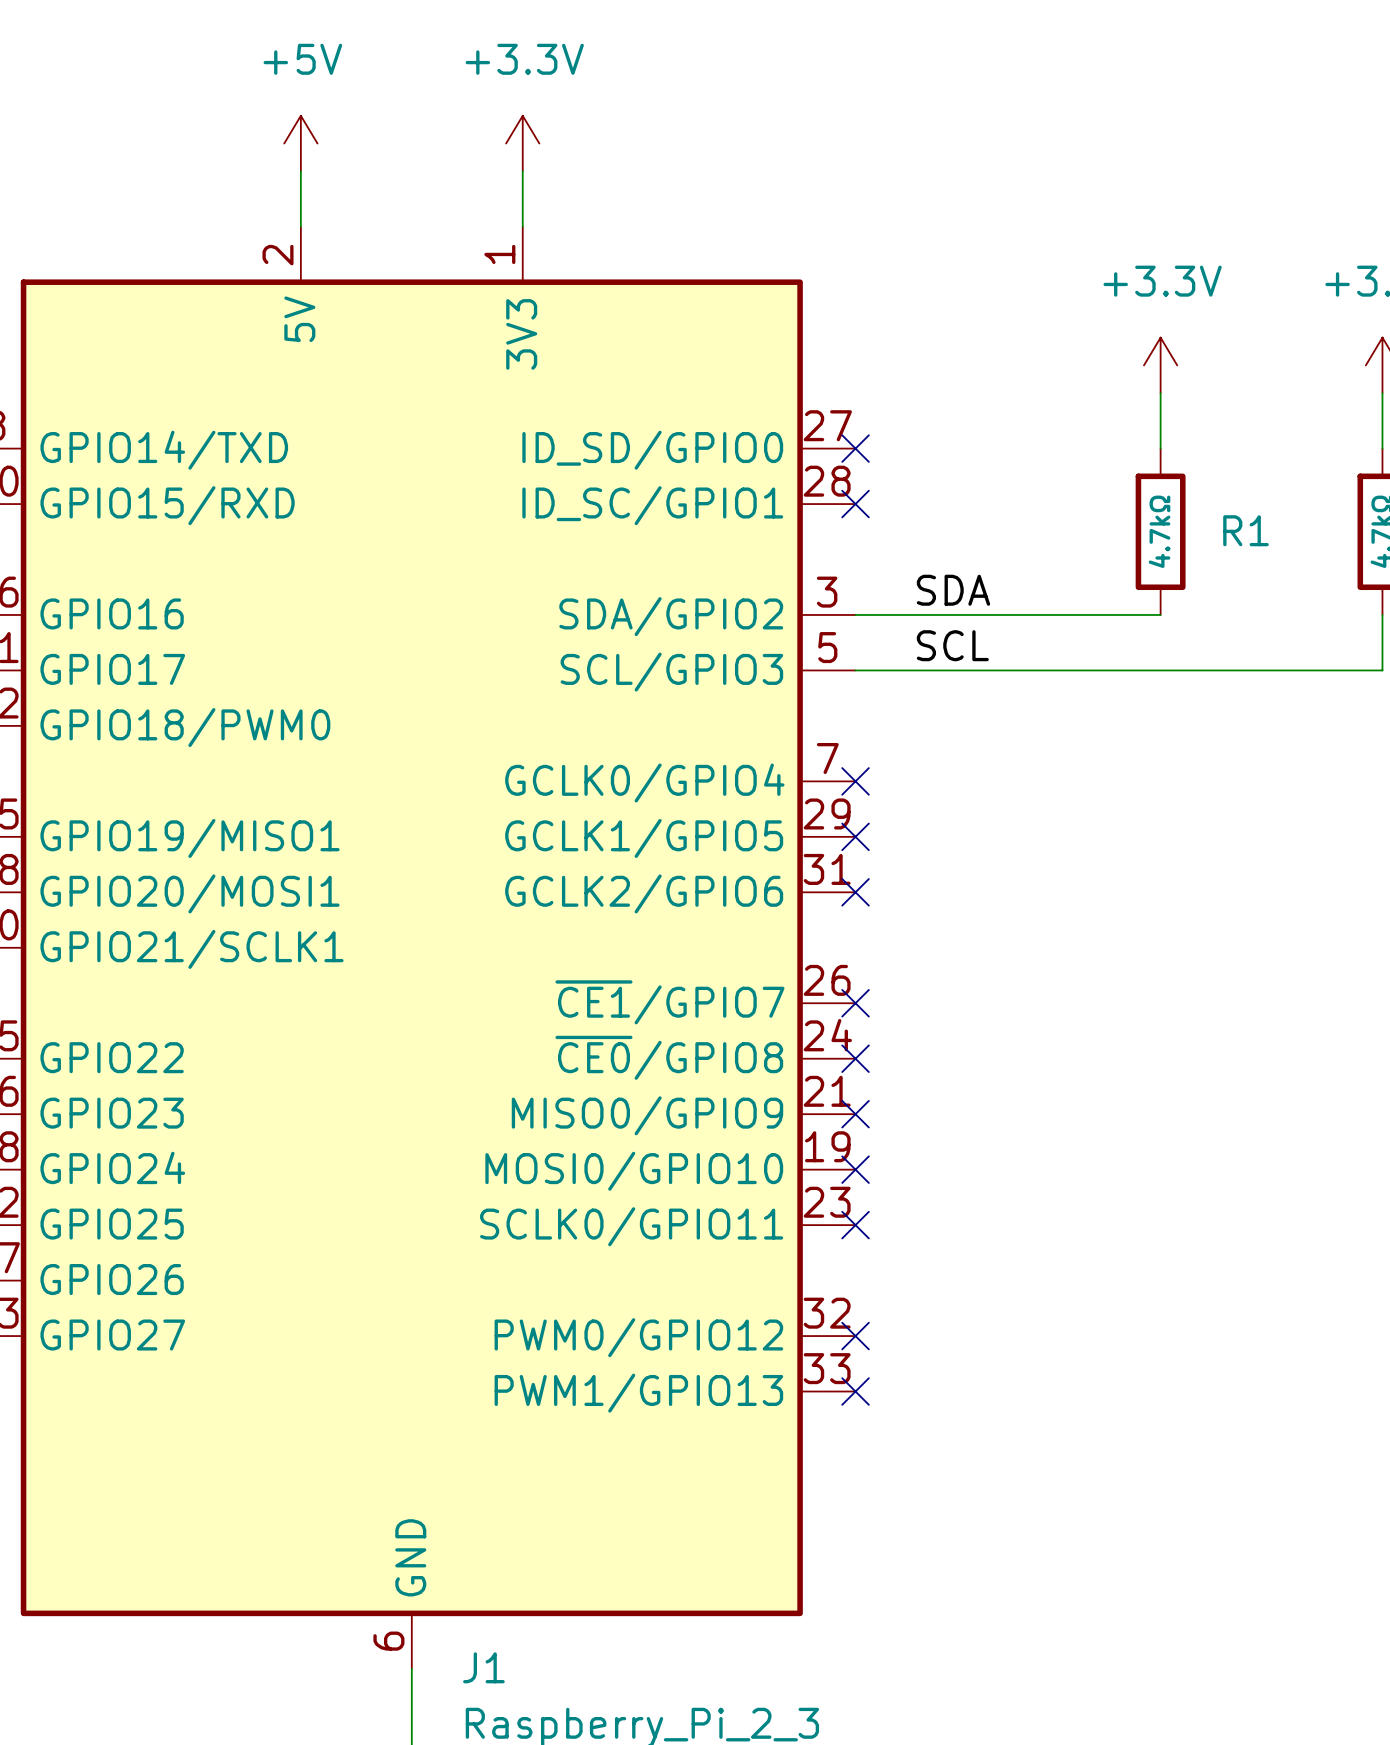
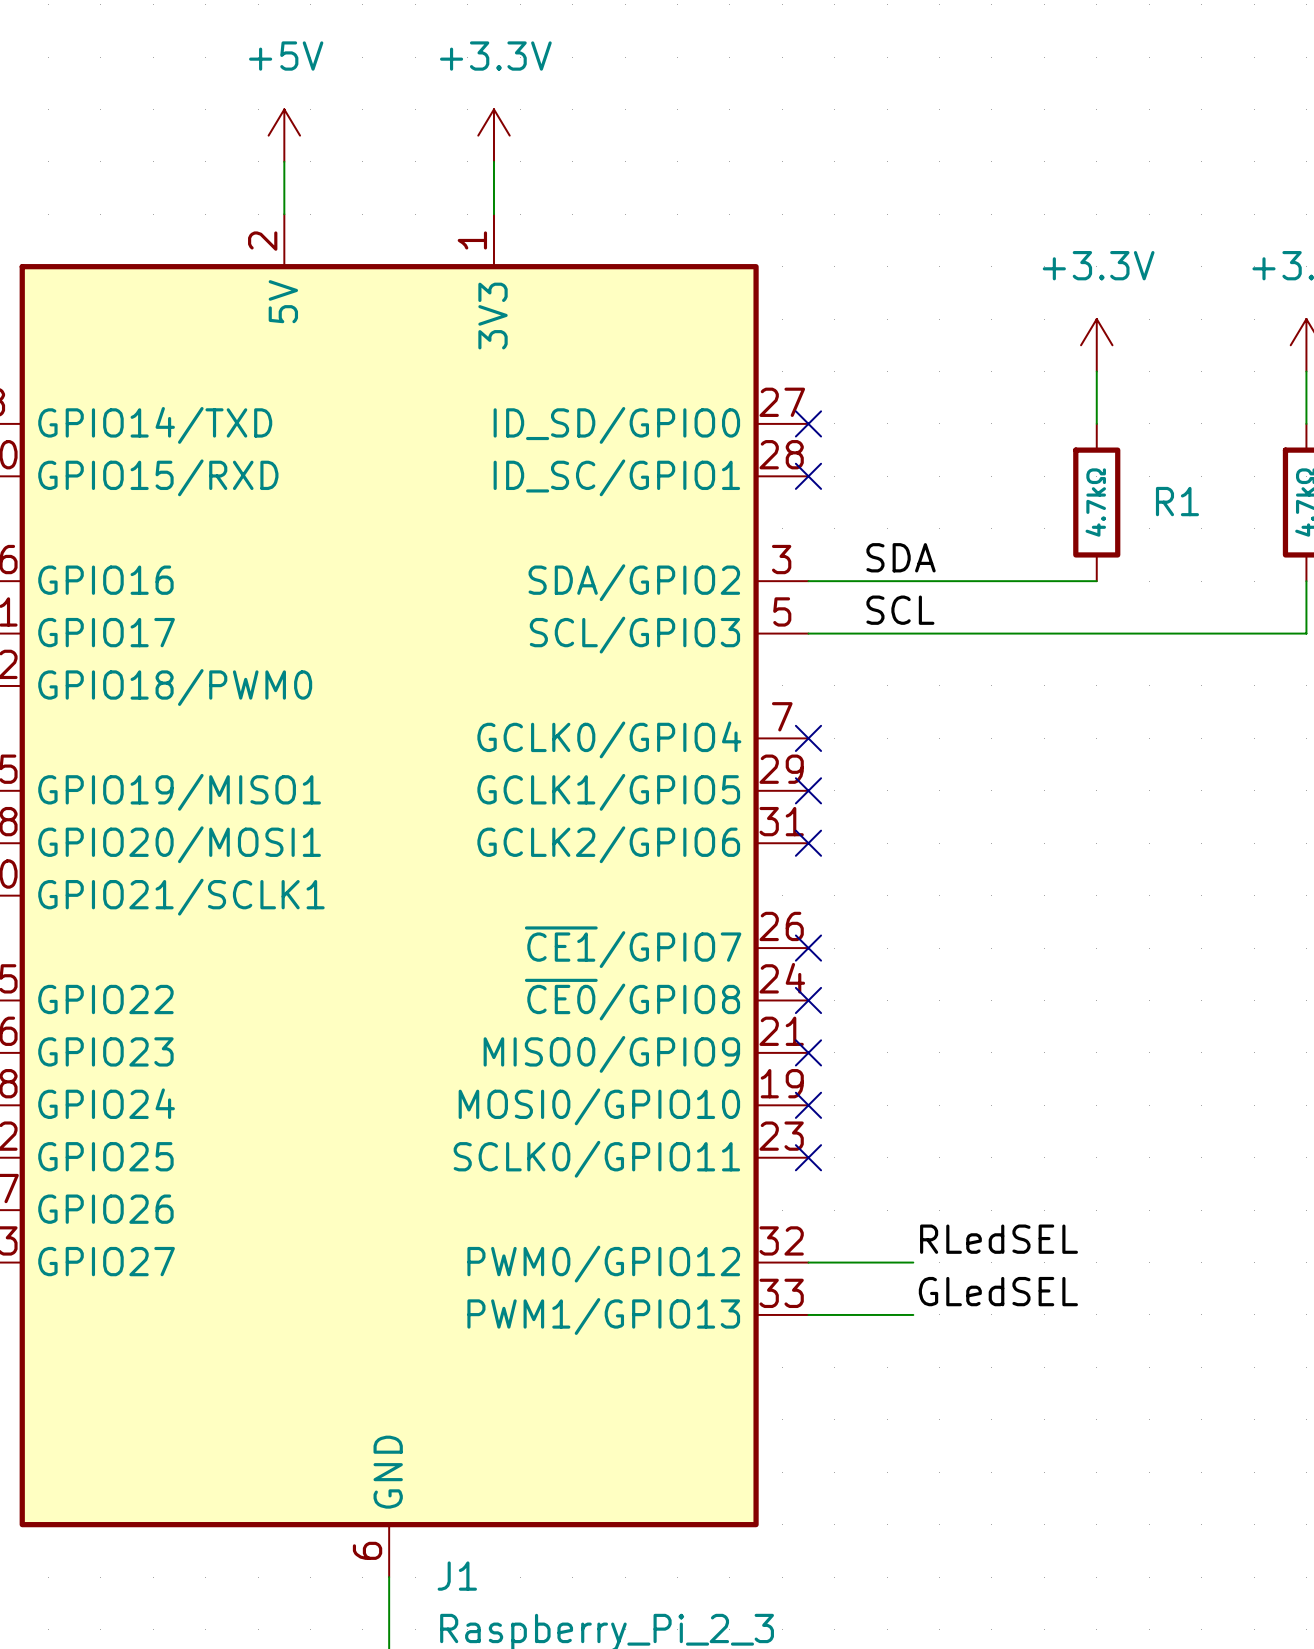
label: none -> RLedSEL (999, 1239)
wire: none -> (808, 1262) (913, 1262)
no-connect mark: (855, 1336) -> none
label: none -> GLedSEL (998, 1291)
wire: none -> (808, 1314) (913, 1314)
no-connect mark: (855, 1391) -> none

